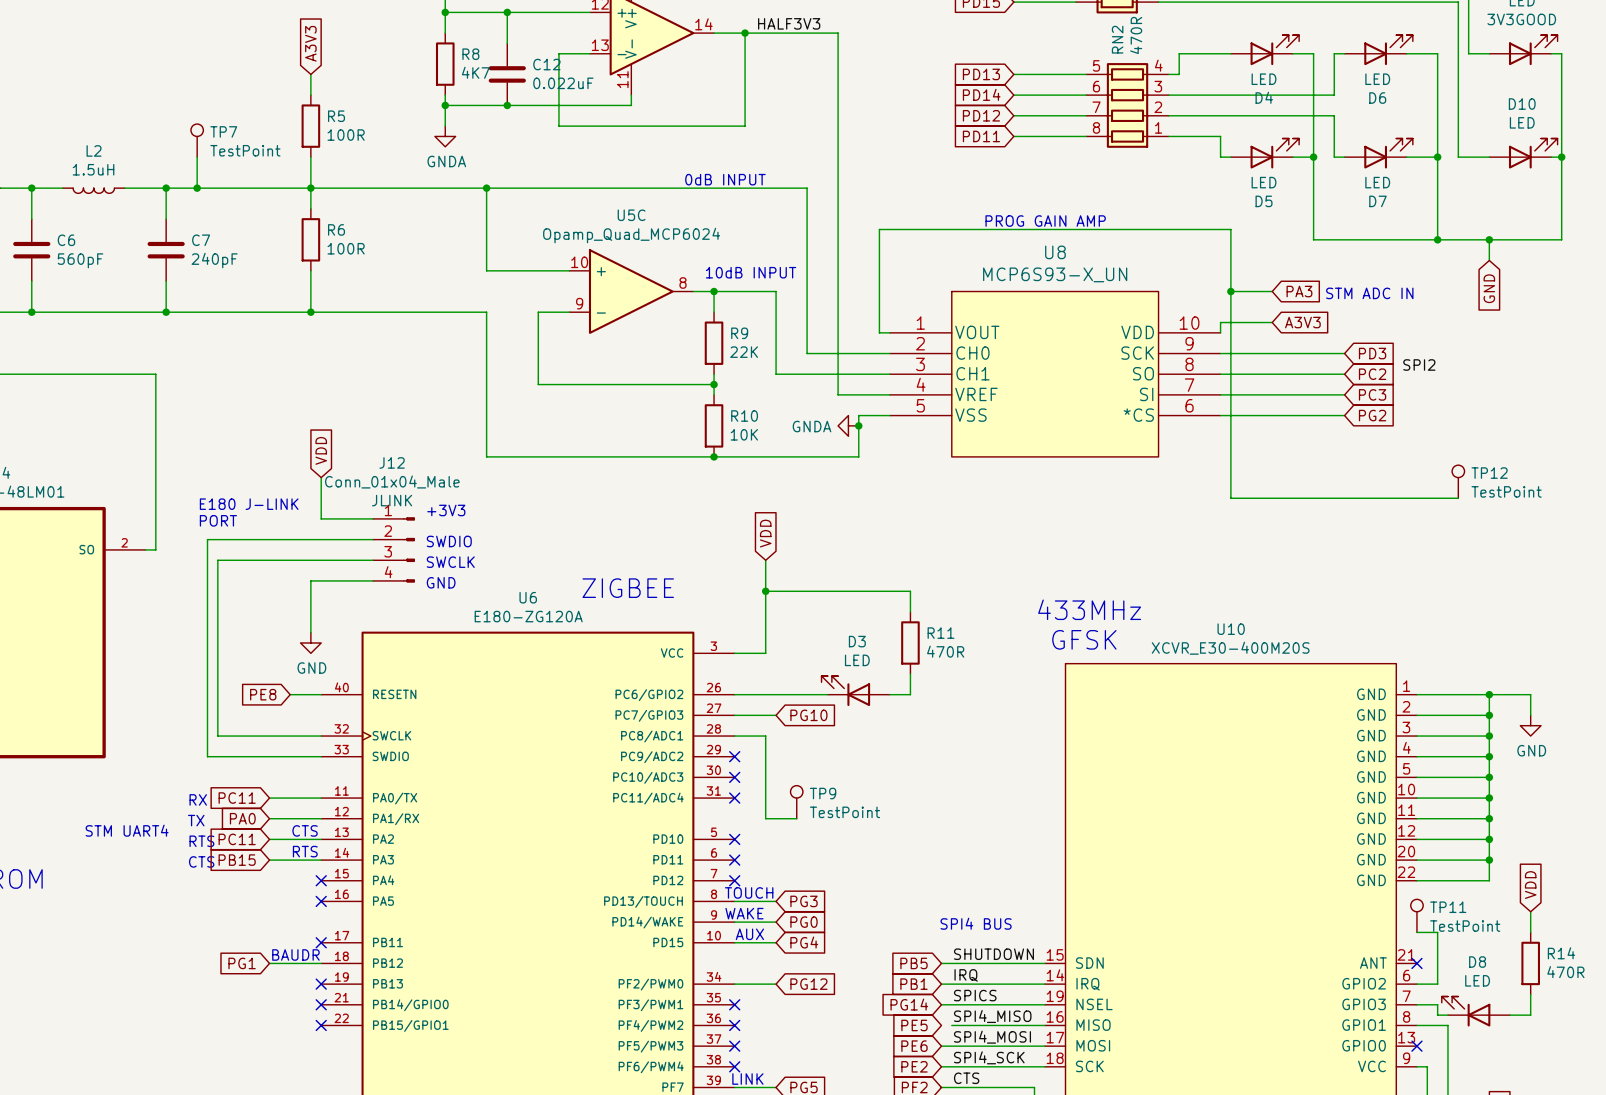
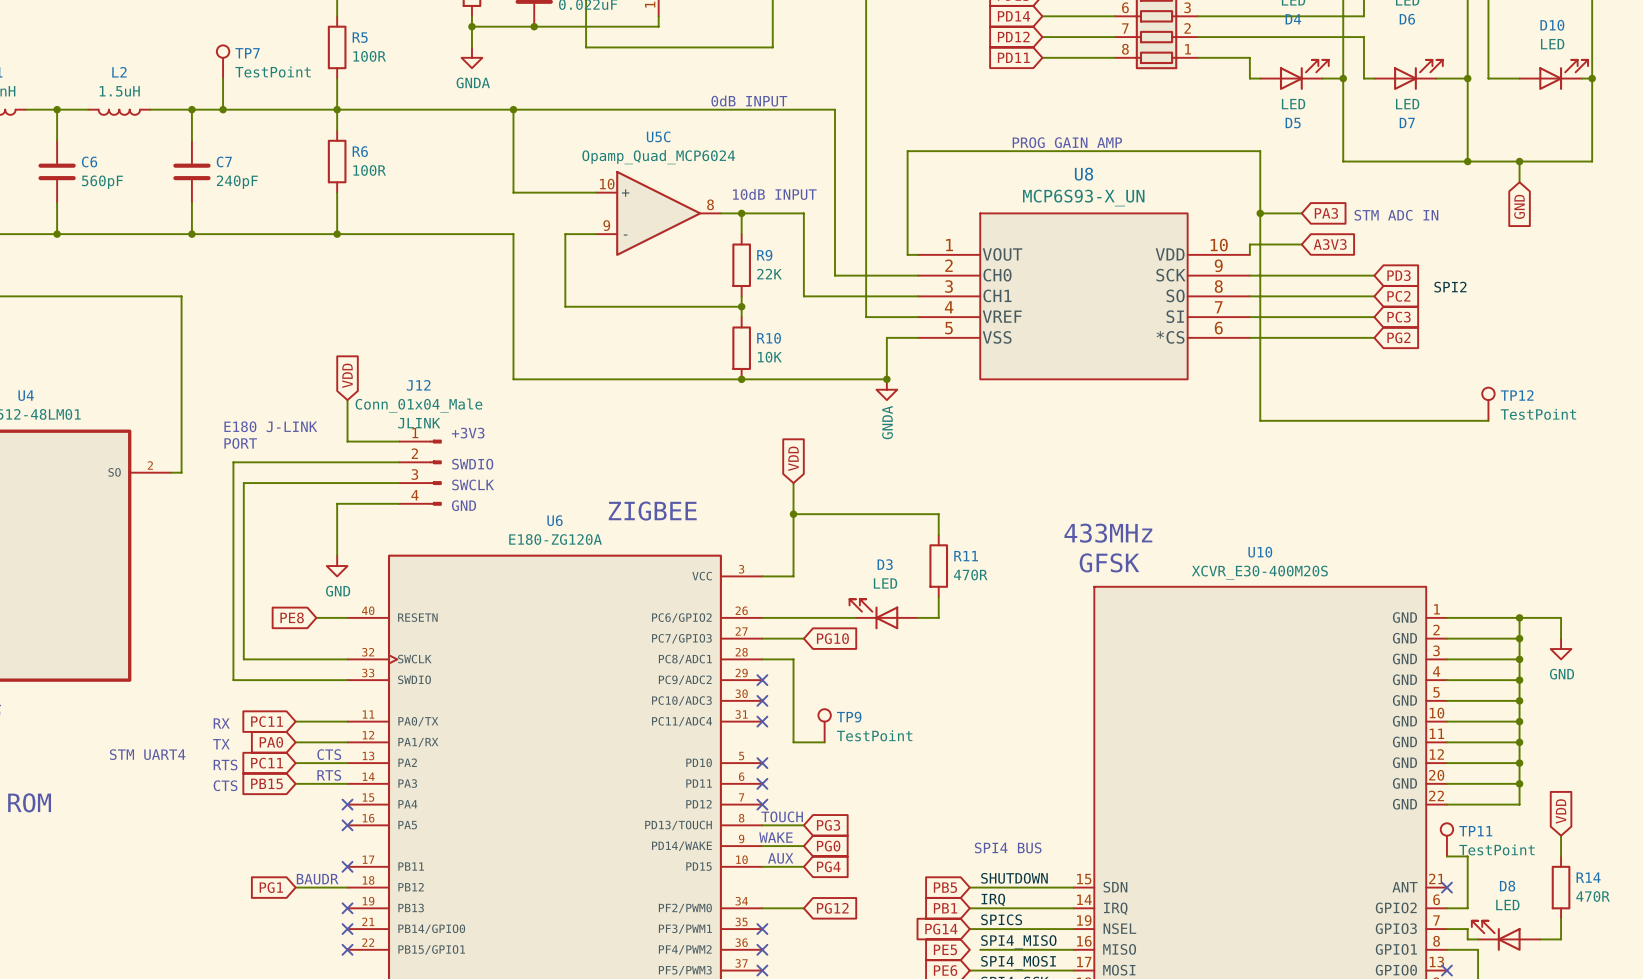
power symbol rotation: 0° (848, 425) -> 90° counterclockwise (886, 389)
power symbol position: GNDA (848, 425) -> GNDA (886, 389)
junction position: (858, 425) -> (886, 379)

